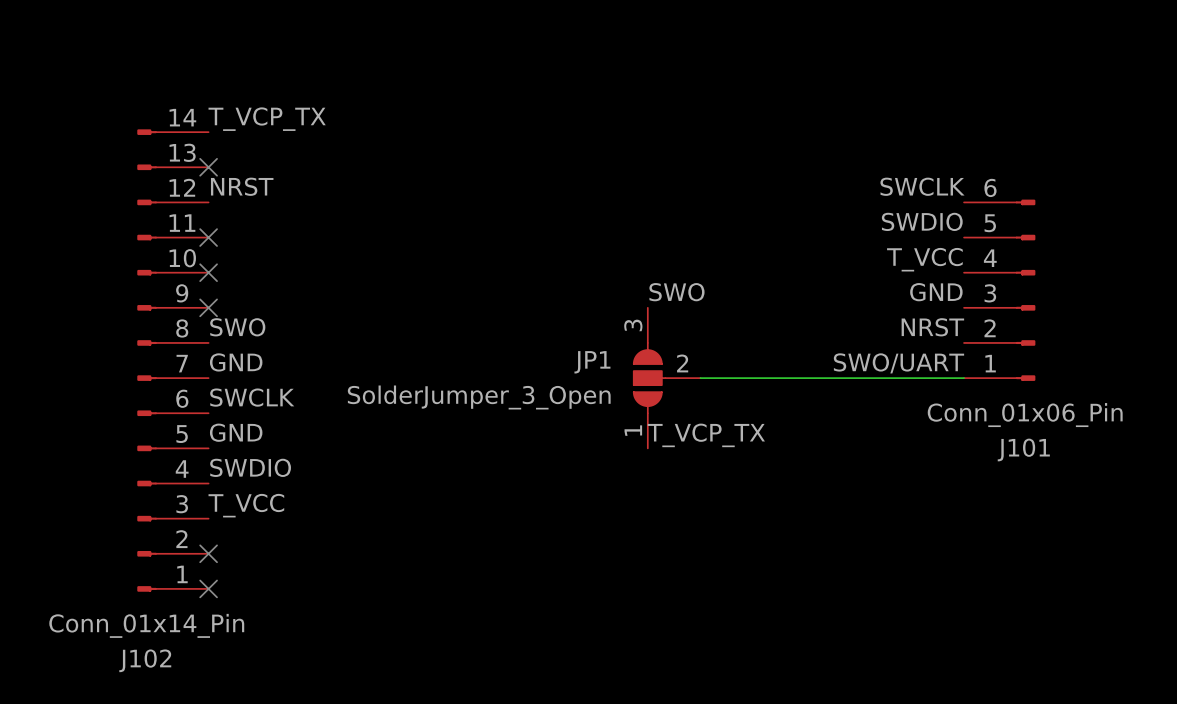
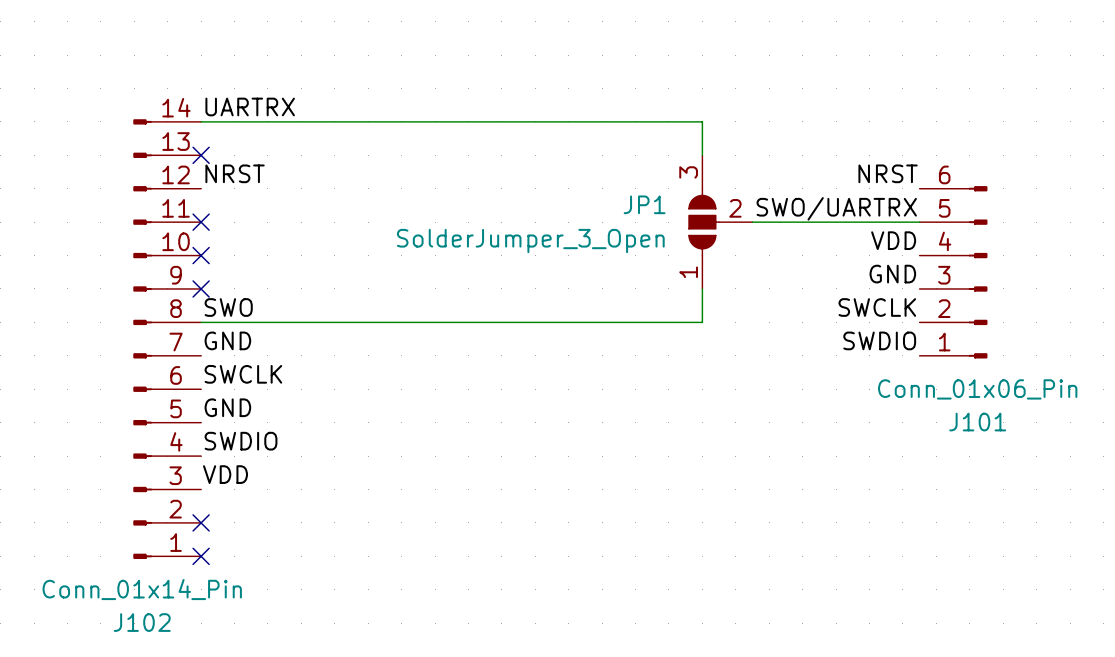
label: T_VCP_TX (267, 119) -> UARTRX (250, 106)
wire: none -> (201, 121) (702, 121) (702, 155)
label: SWCLK (922, 186) -> NRST (888, 173)
label: SWDIO (922, 221) -> SWO/UARTRX (836, 208)
wire: none -> (752, 222) (919, 222)
label: T_VCC (924, 259) -> VDD (893, 240)
label: SWO (676, 292) -> none
wire: none -> (702, 288) (702, 322) (201, 322)
label: NRST (932, 327) -> SWCLK (877, 307)
label: SWO/UART (898, 363) -> SWDIO (879, 340)
JP1 position: (667, 378) -> (720, 222)
wire: (700, 378) (964, 378) -> none
label: T_VCP_TX (706, 435) -> none
label: T_VCC (246, 505) -> VDD (225, 474)

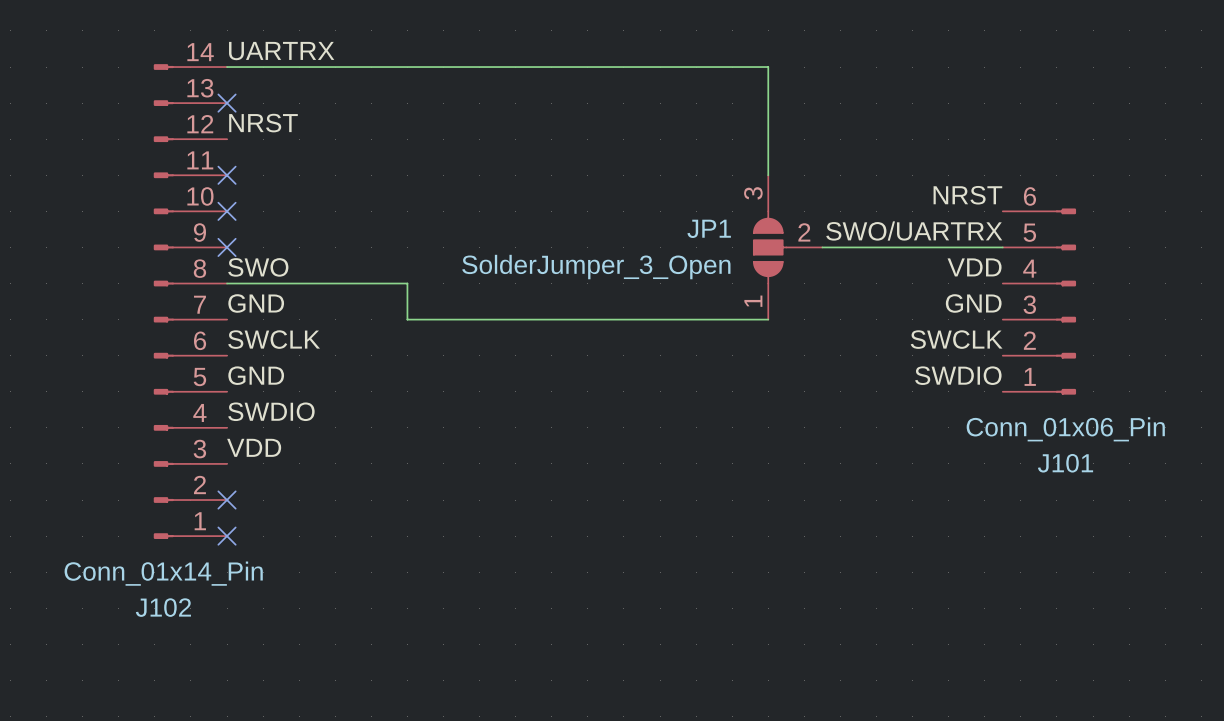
label: none -> UARTRX (281, 51)
no-connect mark: none -> (227, 103)
label: UARTRX (250, 106) -> NRST (263, 123)
wire: (201, 121) (702, 121) -> (227, 67) (768, 67) (768, 139)
label: NRST (235, 173) -> none
no-connect mark: none -> (227, 211)
label: none -> SWO (258, 267)
no-connect mark: (201, 255) -> none
label: none -> GND (256, 303)
no-connect mark: (201, 288) -> none
wire: (702, 288) (702, 322) (201, 322) -> (768, 319) (407, 319) (407, 283) (227, 283)
label: SWO (228, 307) -> SWCLK (274, 339)
J102 position: (167, 339) -> (190, 301)
label: SWCLK (243, 374) -> SWDIO (271, 411)
label: GND (227, 407) -> VDD (254, 447)
label: SWDIO (241, 441) -> none
no-connect mark: none -> (227, 500)
label: VDD (225, 474) -> none
no-connect mark: none -> (227, 536)
no-connect mark: (201, 522) -> none
no-connect mark: (201, 556) -> none

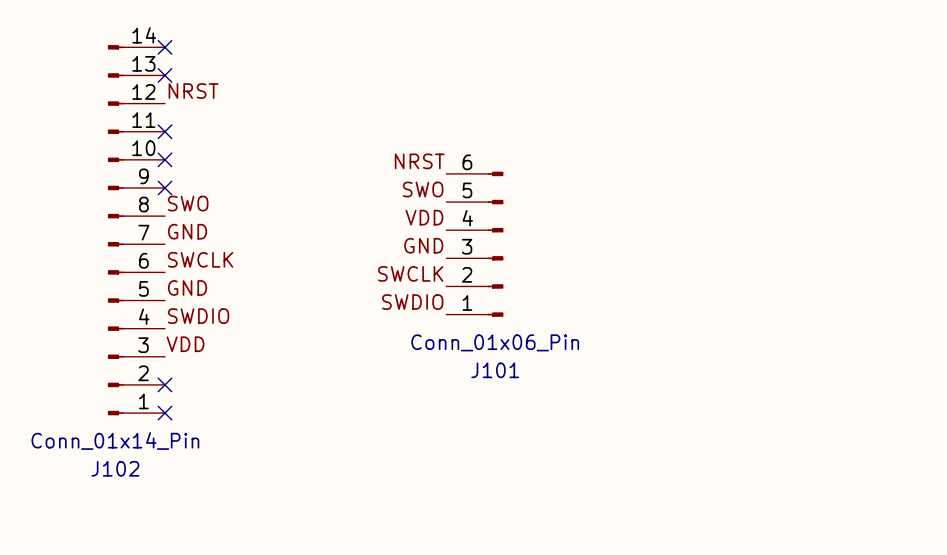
label: UARTRX (281, 51) -> none
wire: (227, 67) (768, 67) (768, 175) -> none
no-connect mark: none -> (164, 47)
label: NRST (967, 195) -> none
label: none -> NRST (419, 161)
label: SWO/UARTRX (914, 230) -> none
JP1: SolderJumper_3_Open (788, 247) -> none
wire: (822, 247) (1002, 247) -> none
label: none -> SWO (423, 189)
label: VDD (974, 267) -> none
wire: (227, 283) (407, 283) (407, 319) (768, 319) -> none
label: none -> VDD (424, 217)
J101 position: (1039, 301) -> (474, 244)
label: GND (973, 303) -> none
label: none -> GND (423, 245)
label: SWCLK (956, 339) -> none
label: none -> SWCLK (410, 273)
label: SWDIO (958, 375) -> none
label: none -> SWDIO (412, 302)

